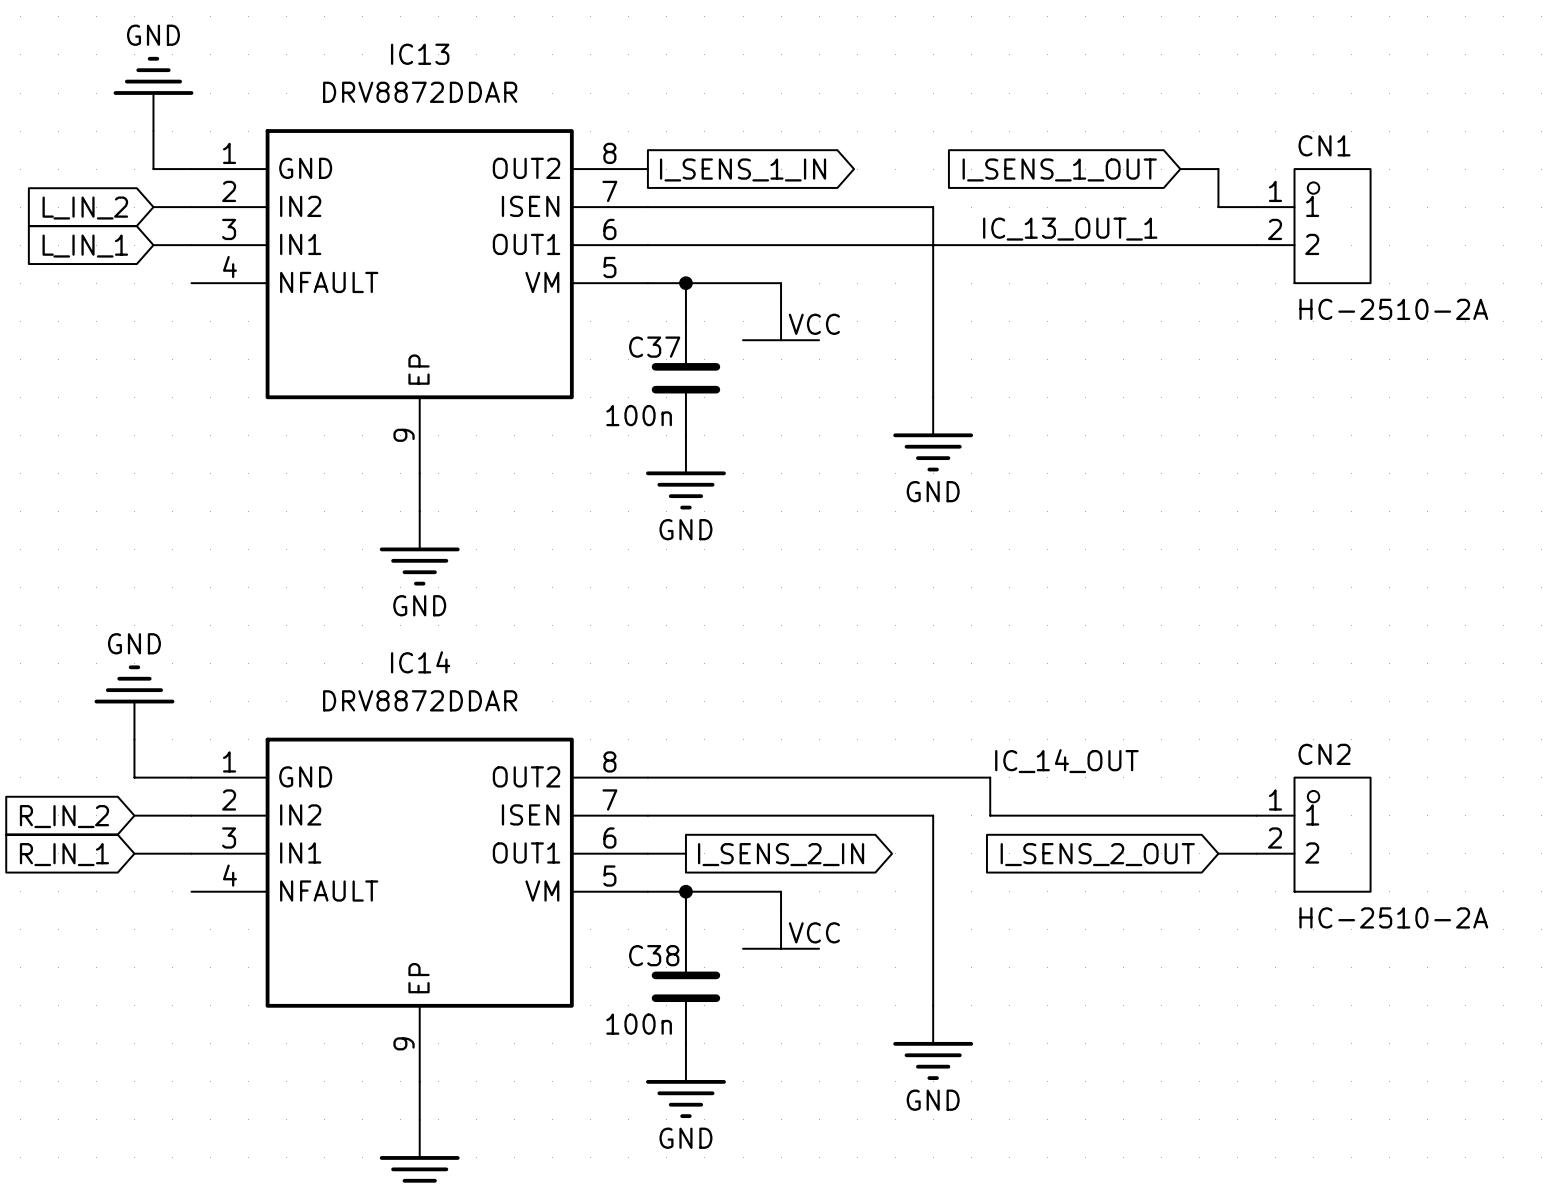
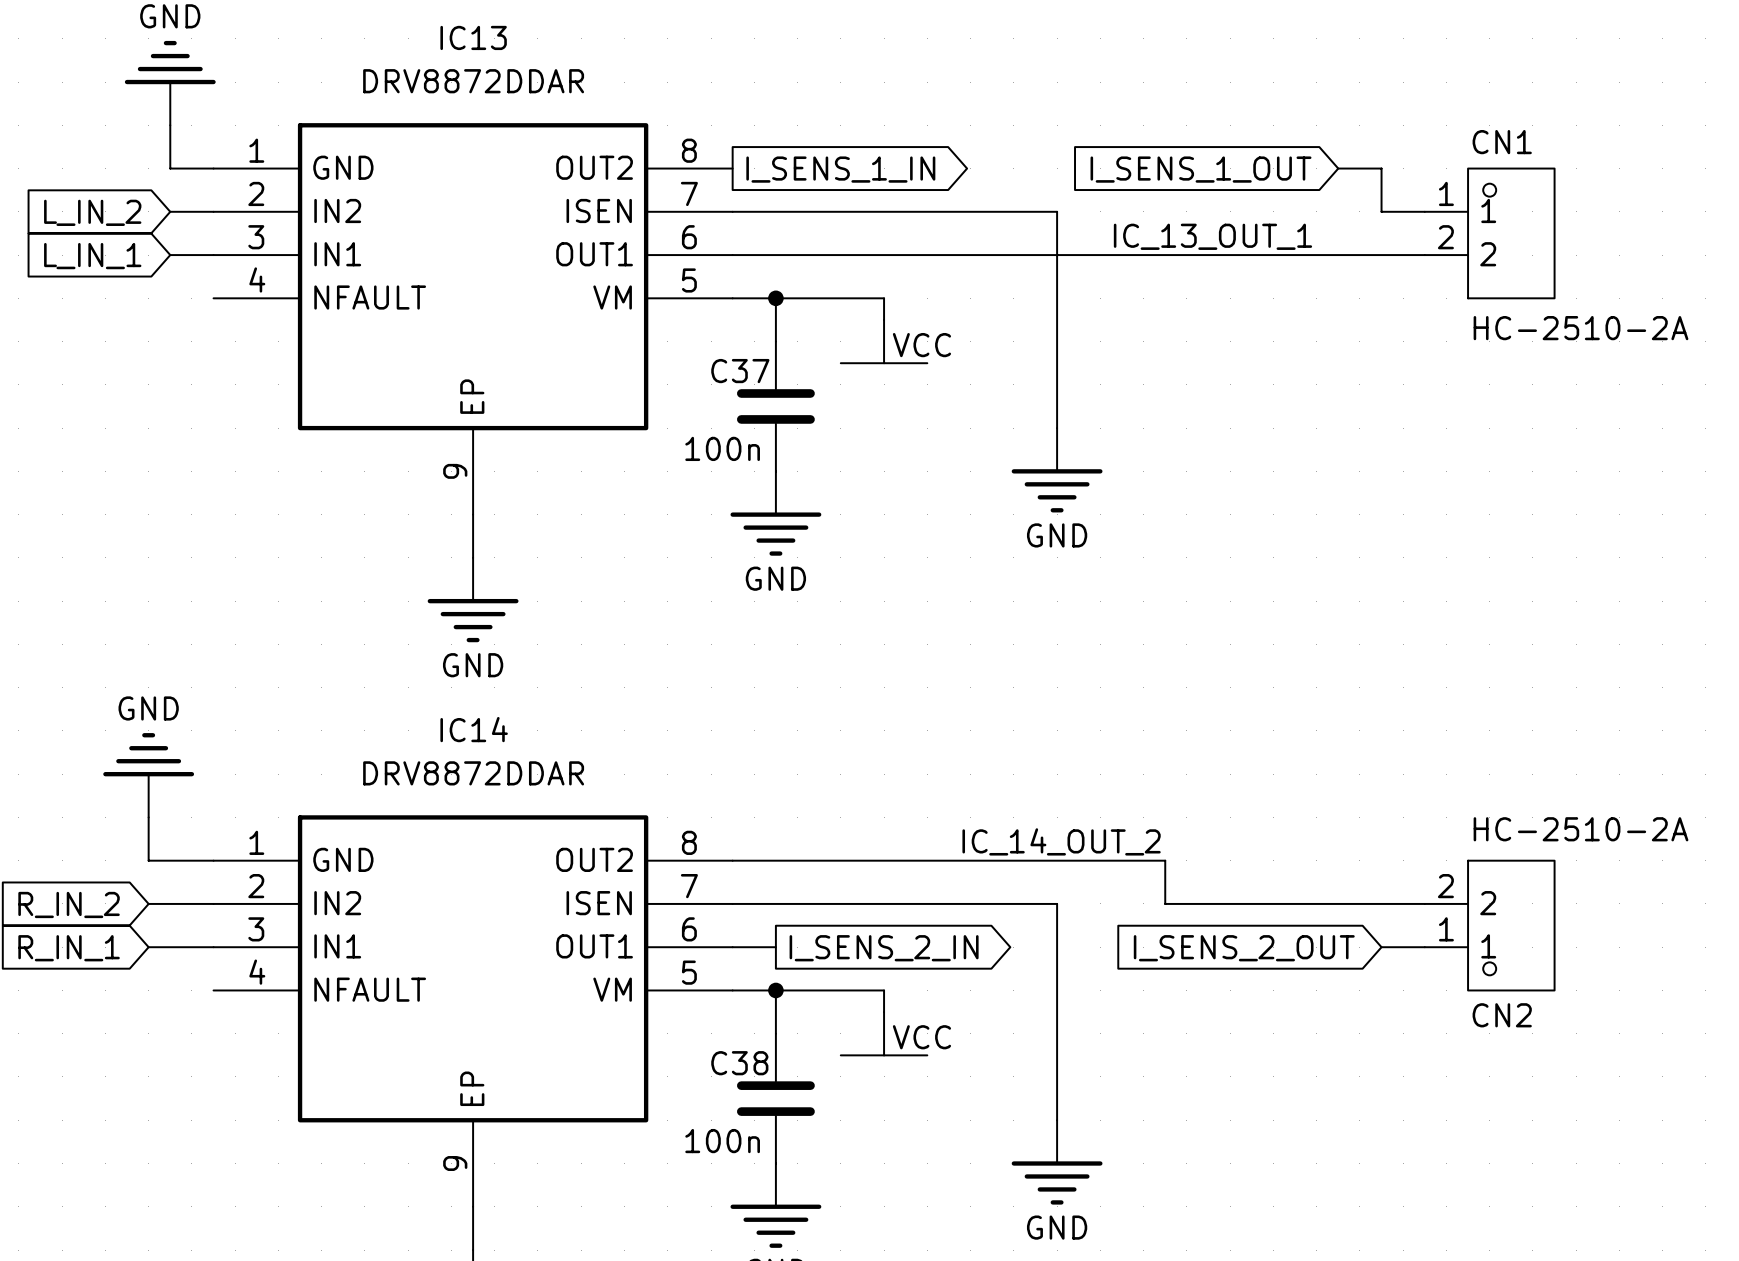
label: IC_14_OUT (1066, 761) -> IC_14_OUT_2 (1061, 841)
wire: (990, 777) (990, 815) (1028, 815) -> (1121, 860) (1165, 860) (1165, 903)
CN2 flip: as is (1332, 834) -> up-down (1511, 925)

